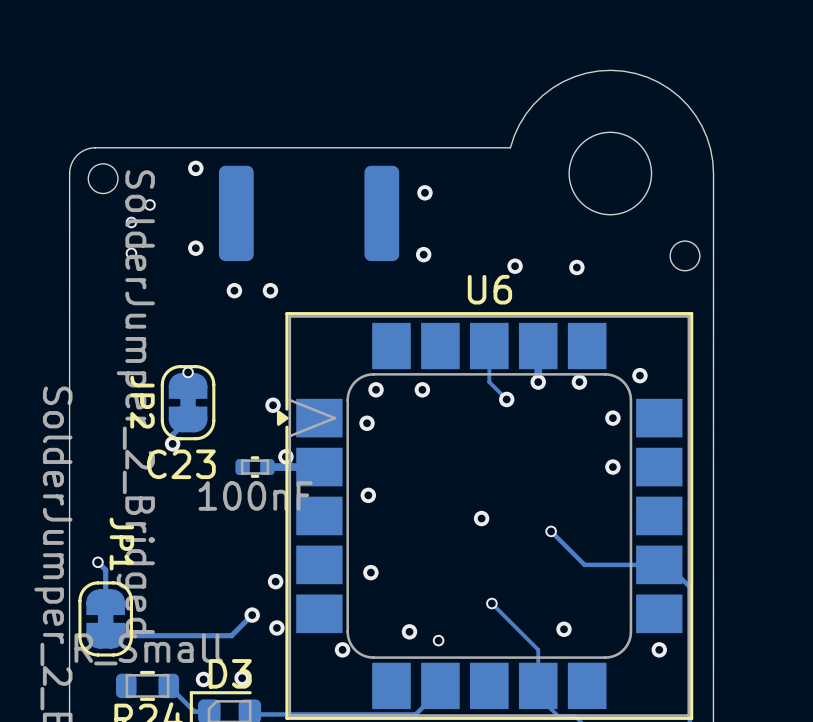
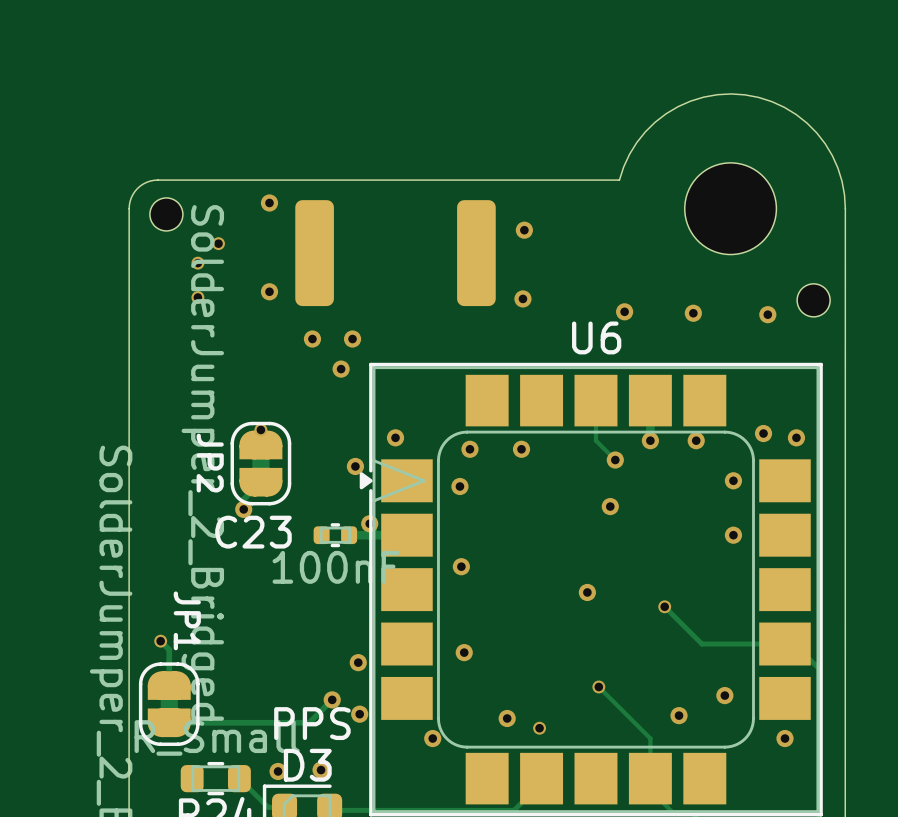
via: none -> (767, 314)
via: none -> (341, 369)
via: none -> (395, 437)
via: none -> (796, 437)
via: none -> (610, 506)
via: none -> (724, 695)
text: none -> PPS (312, 723)

